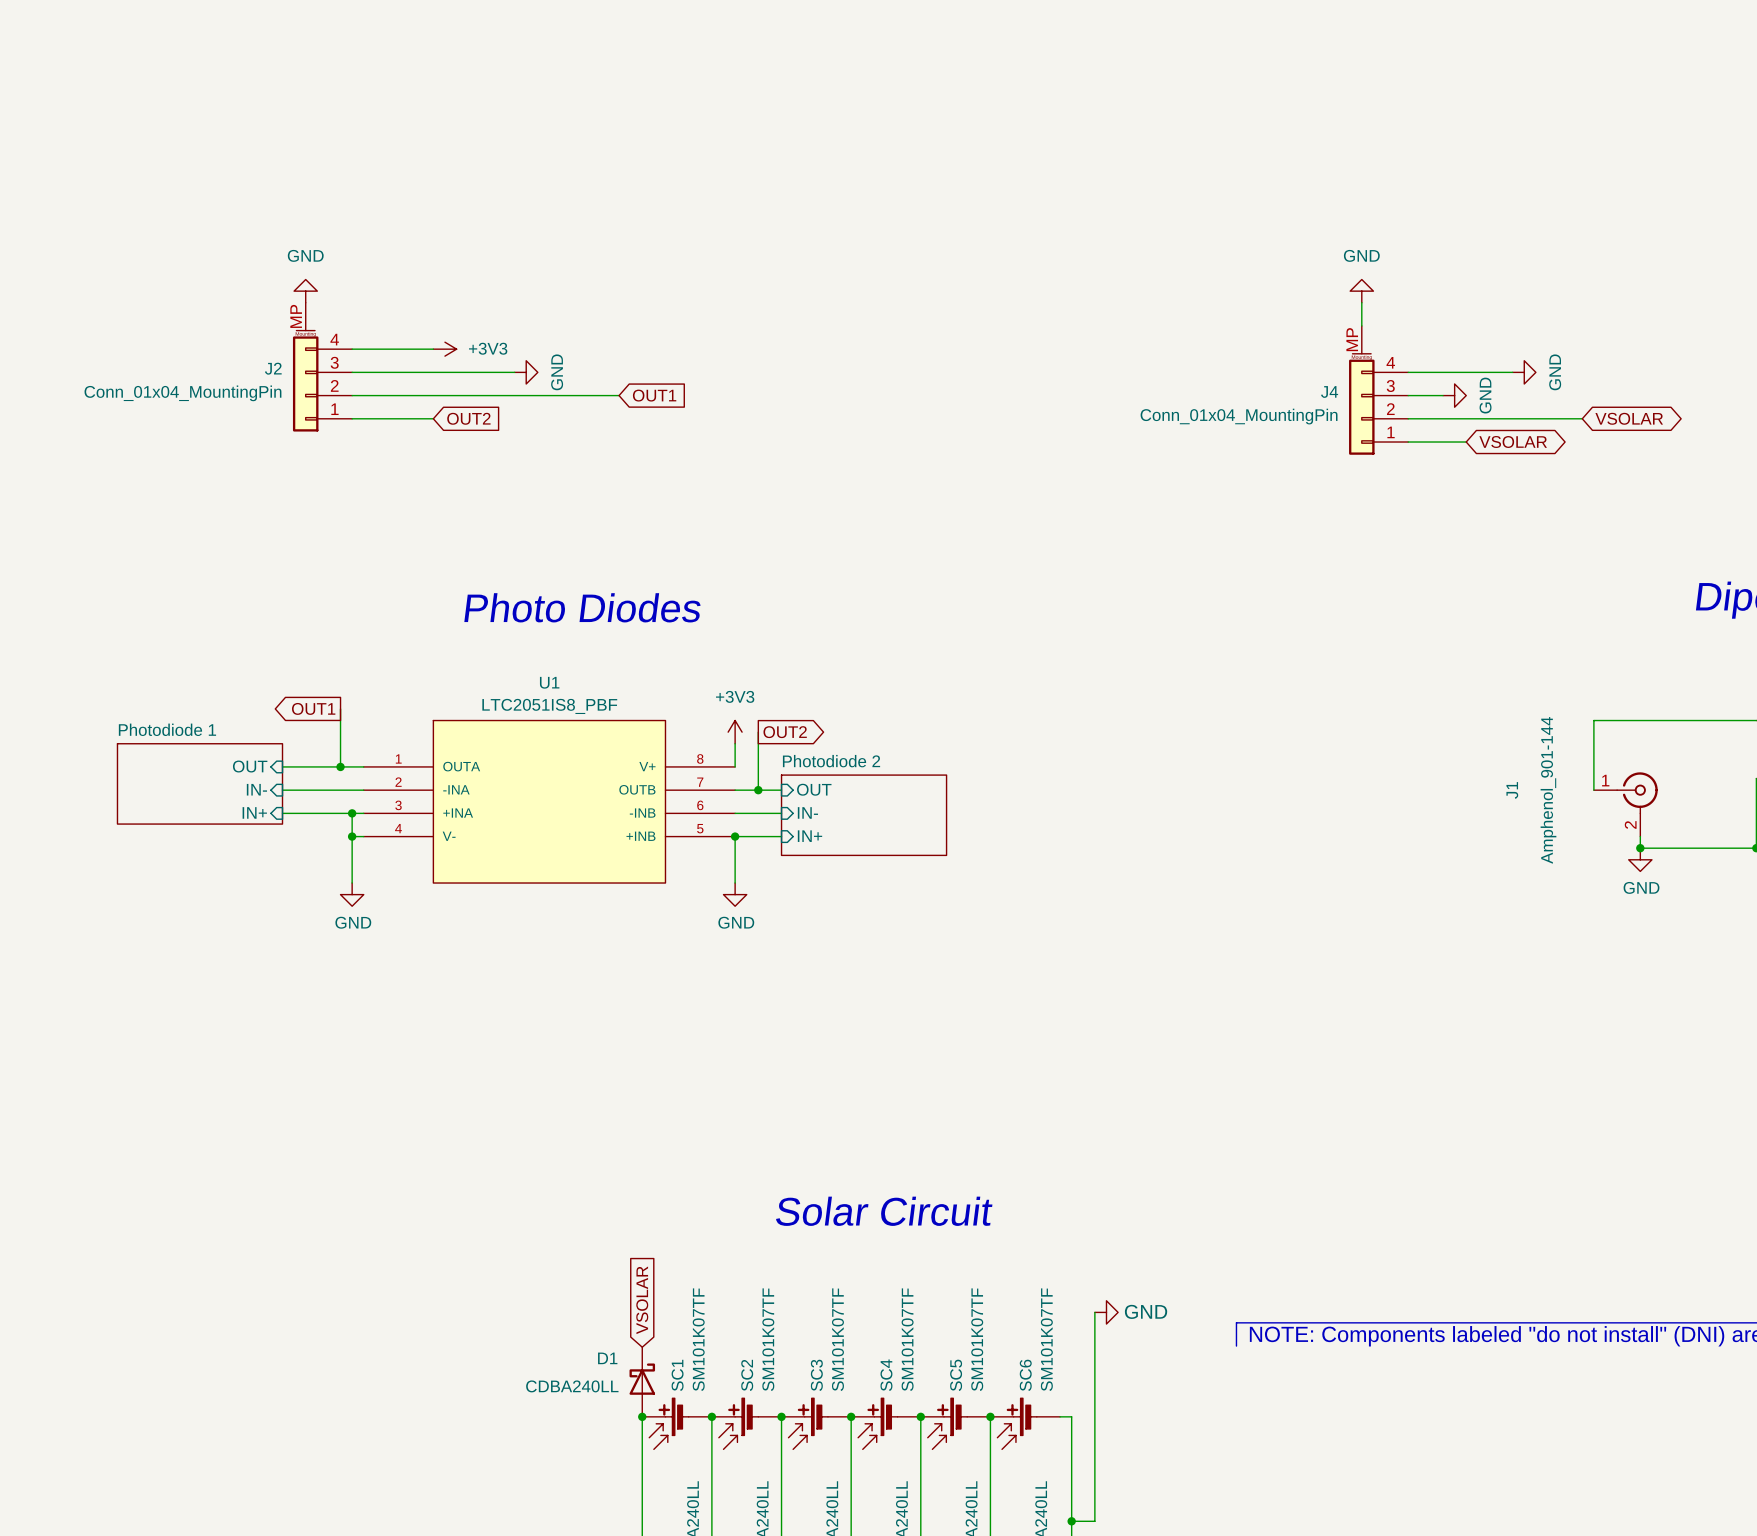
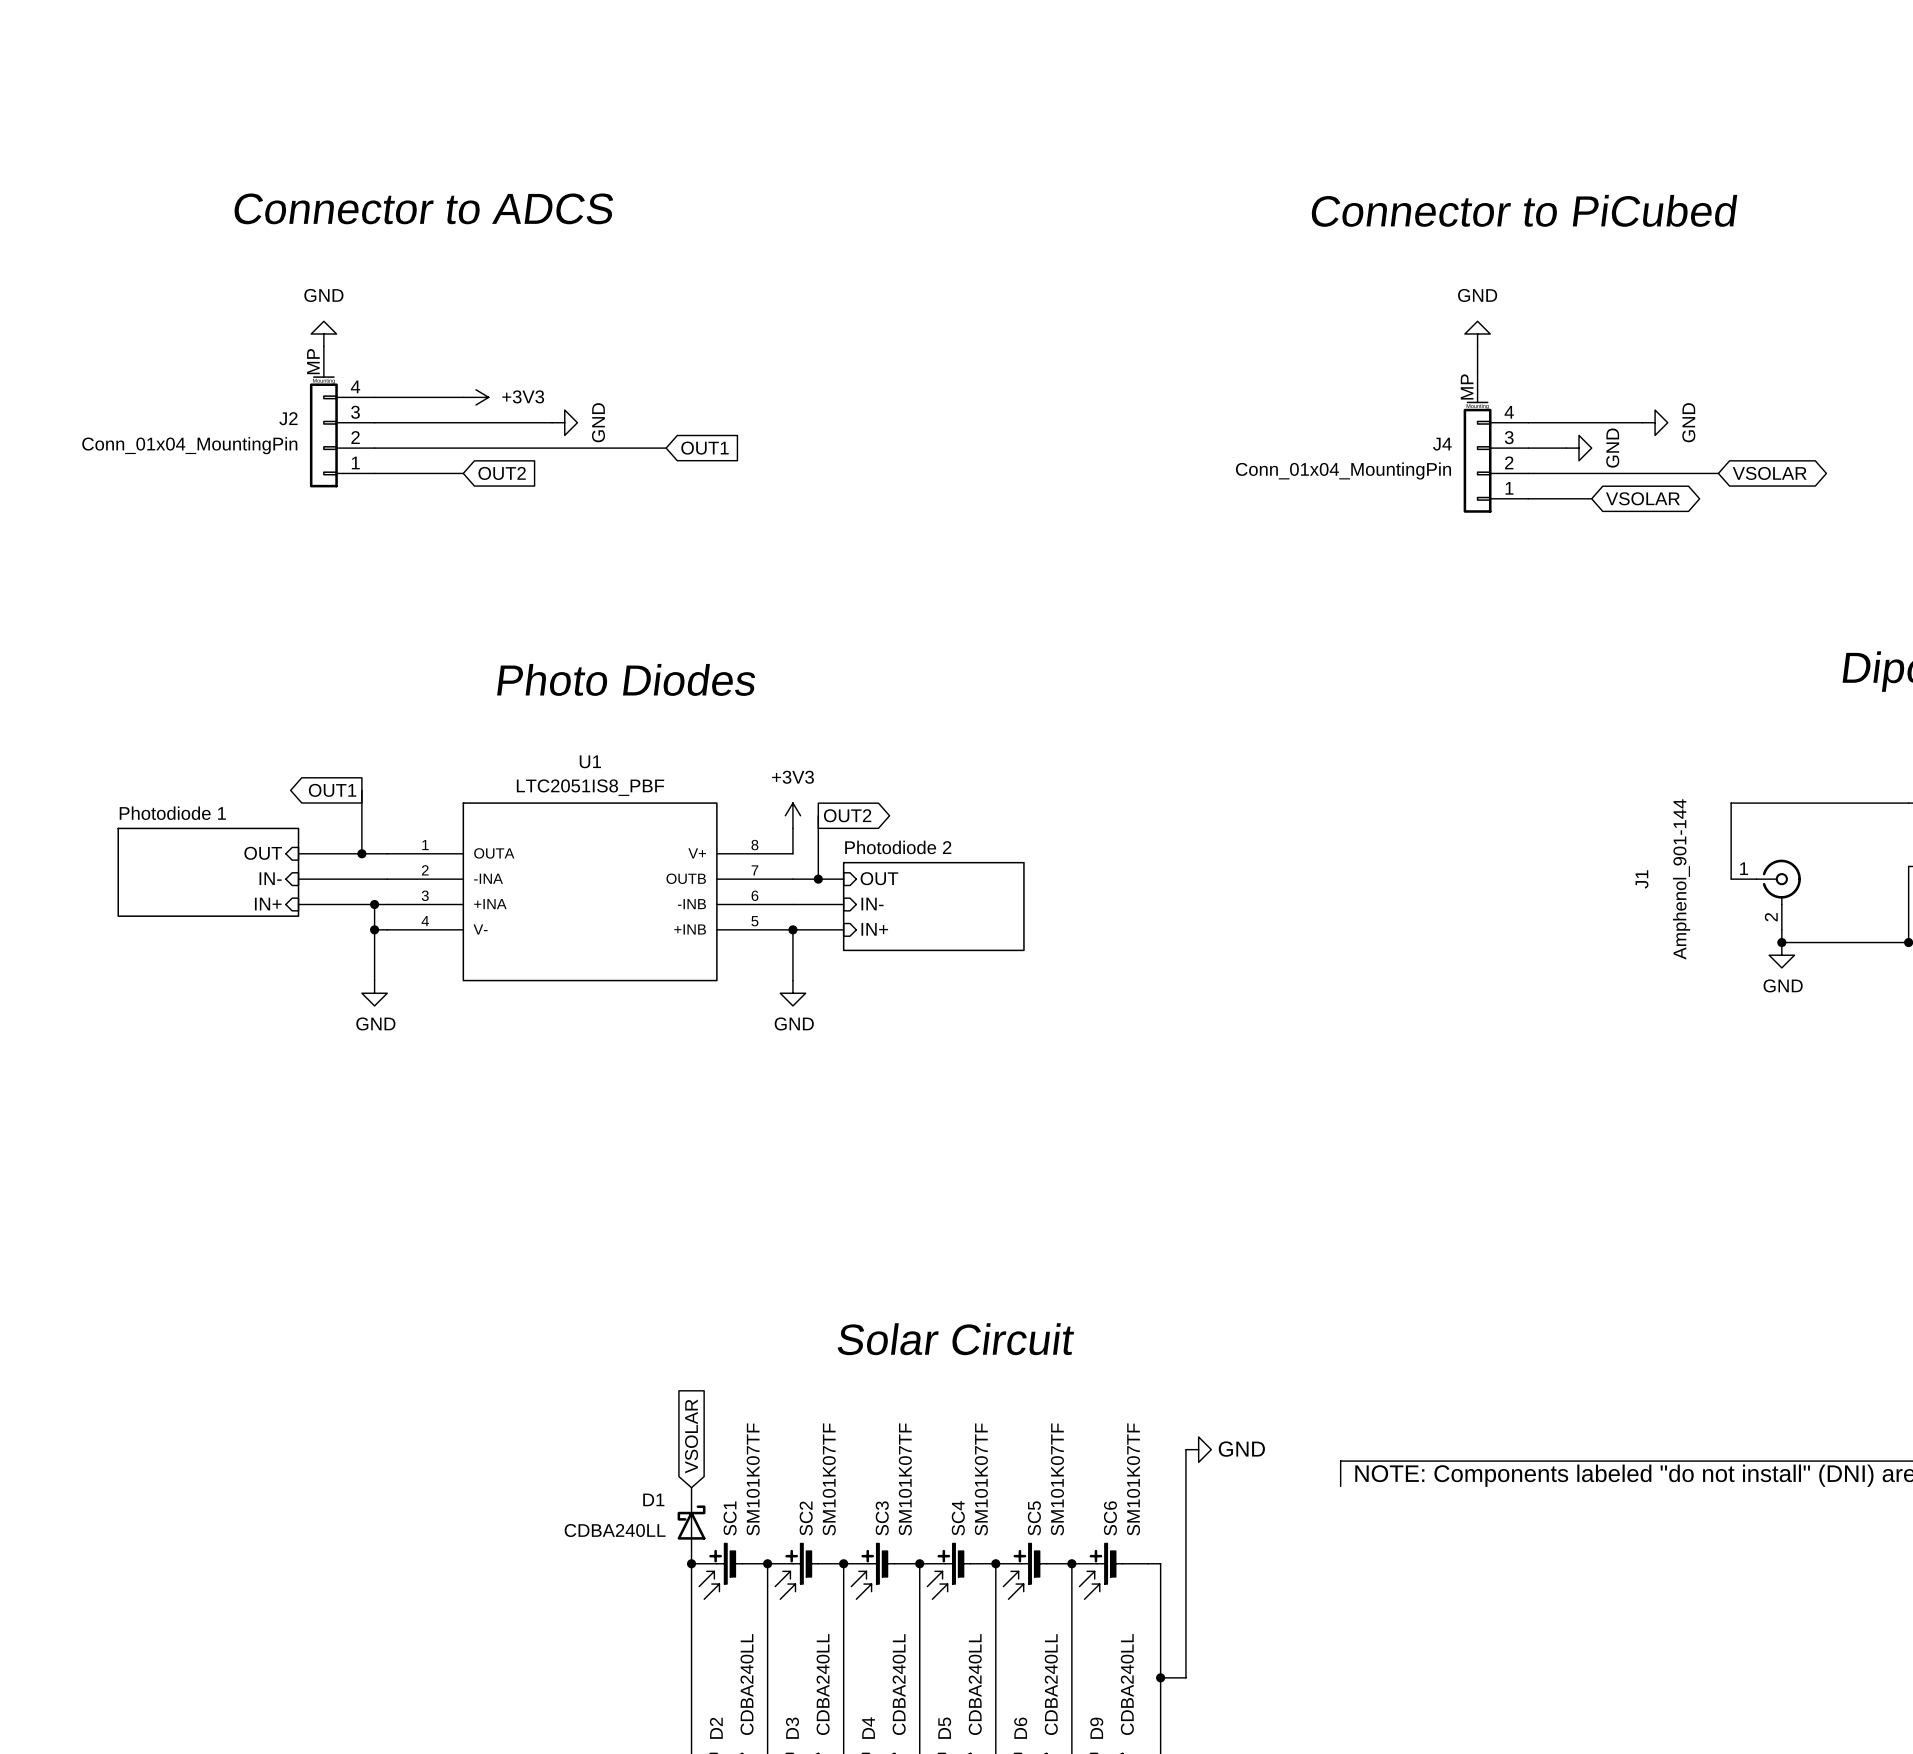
text: none -> Connector to ADCS (423, 208)
text: none -> Connector to PiCubed (1524, 210)

